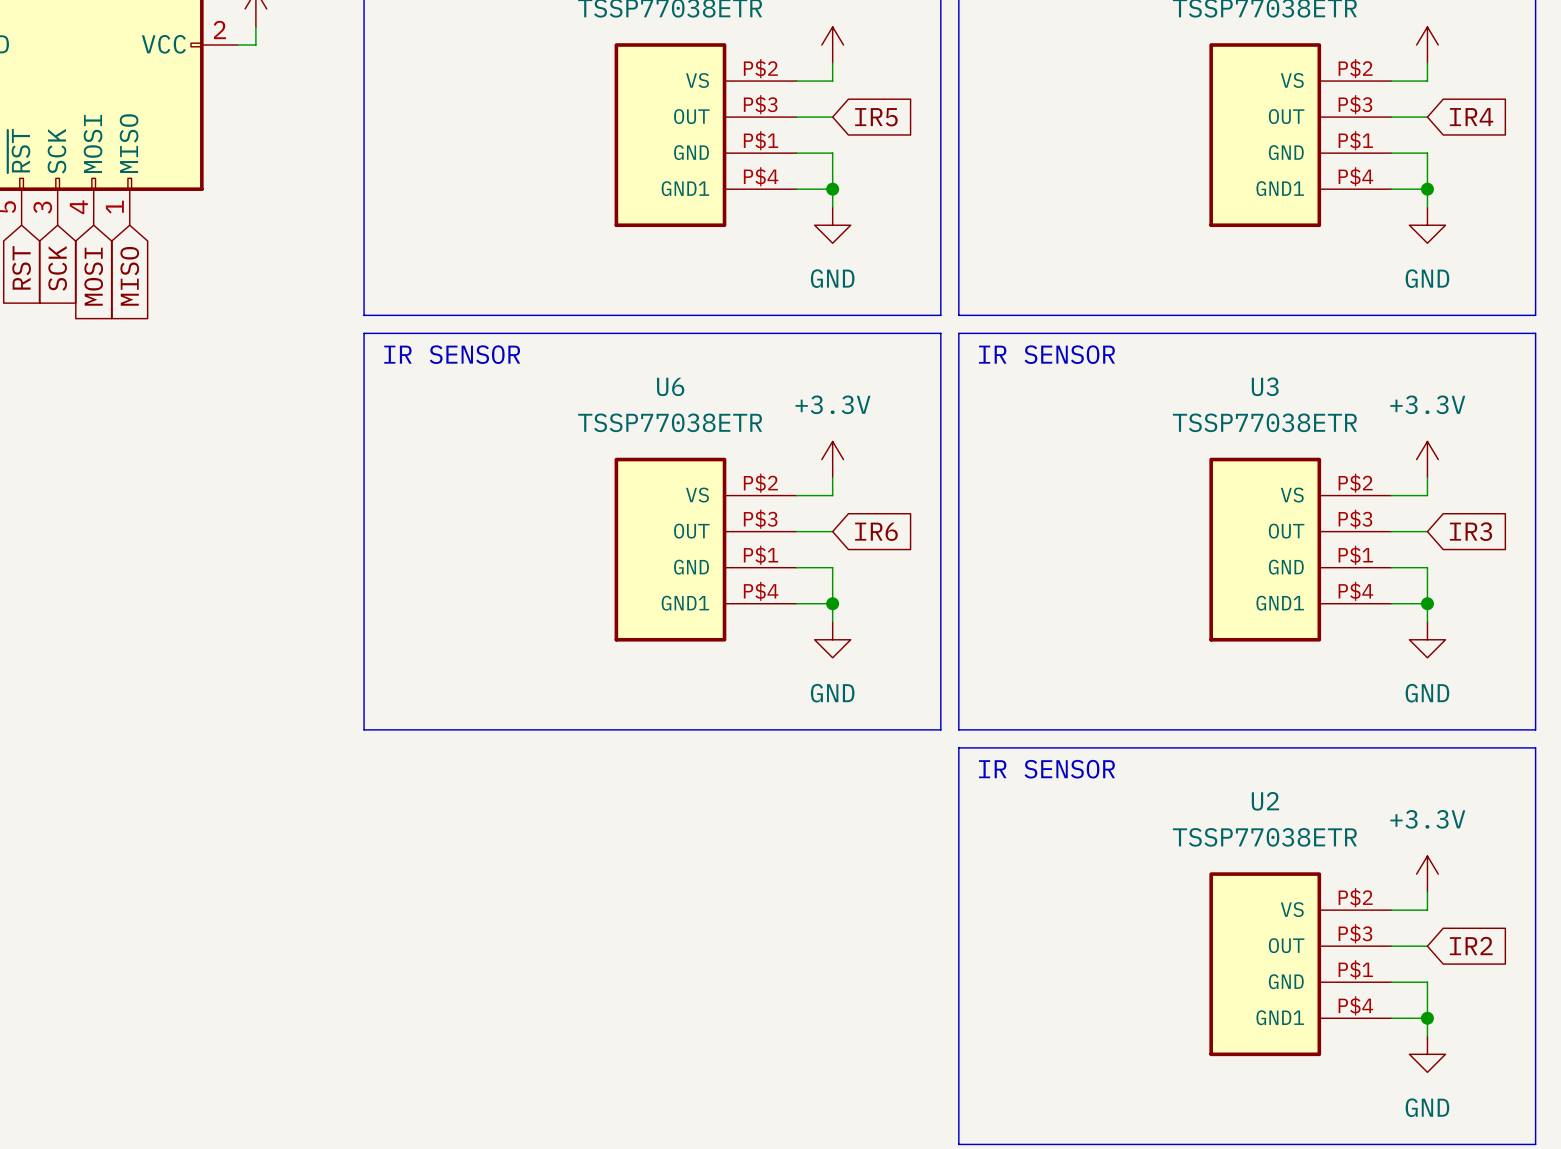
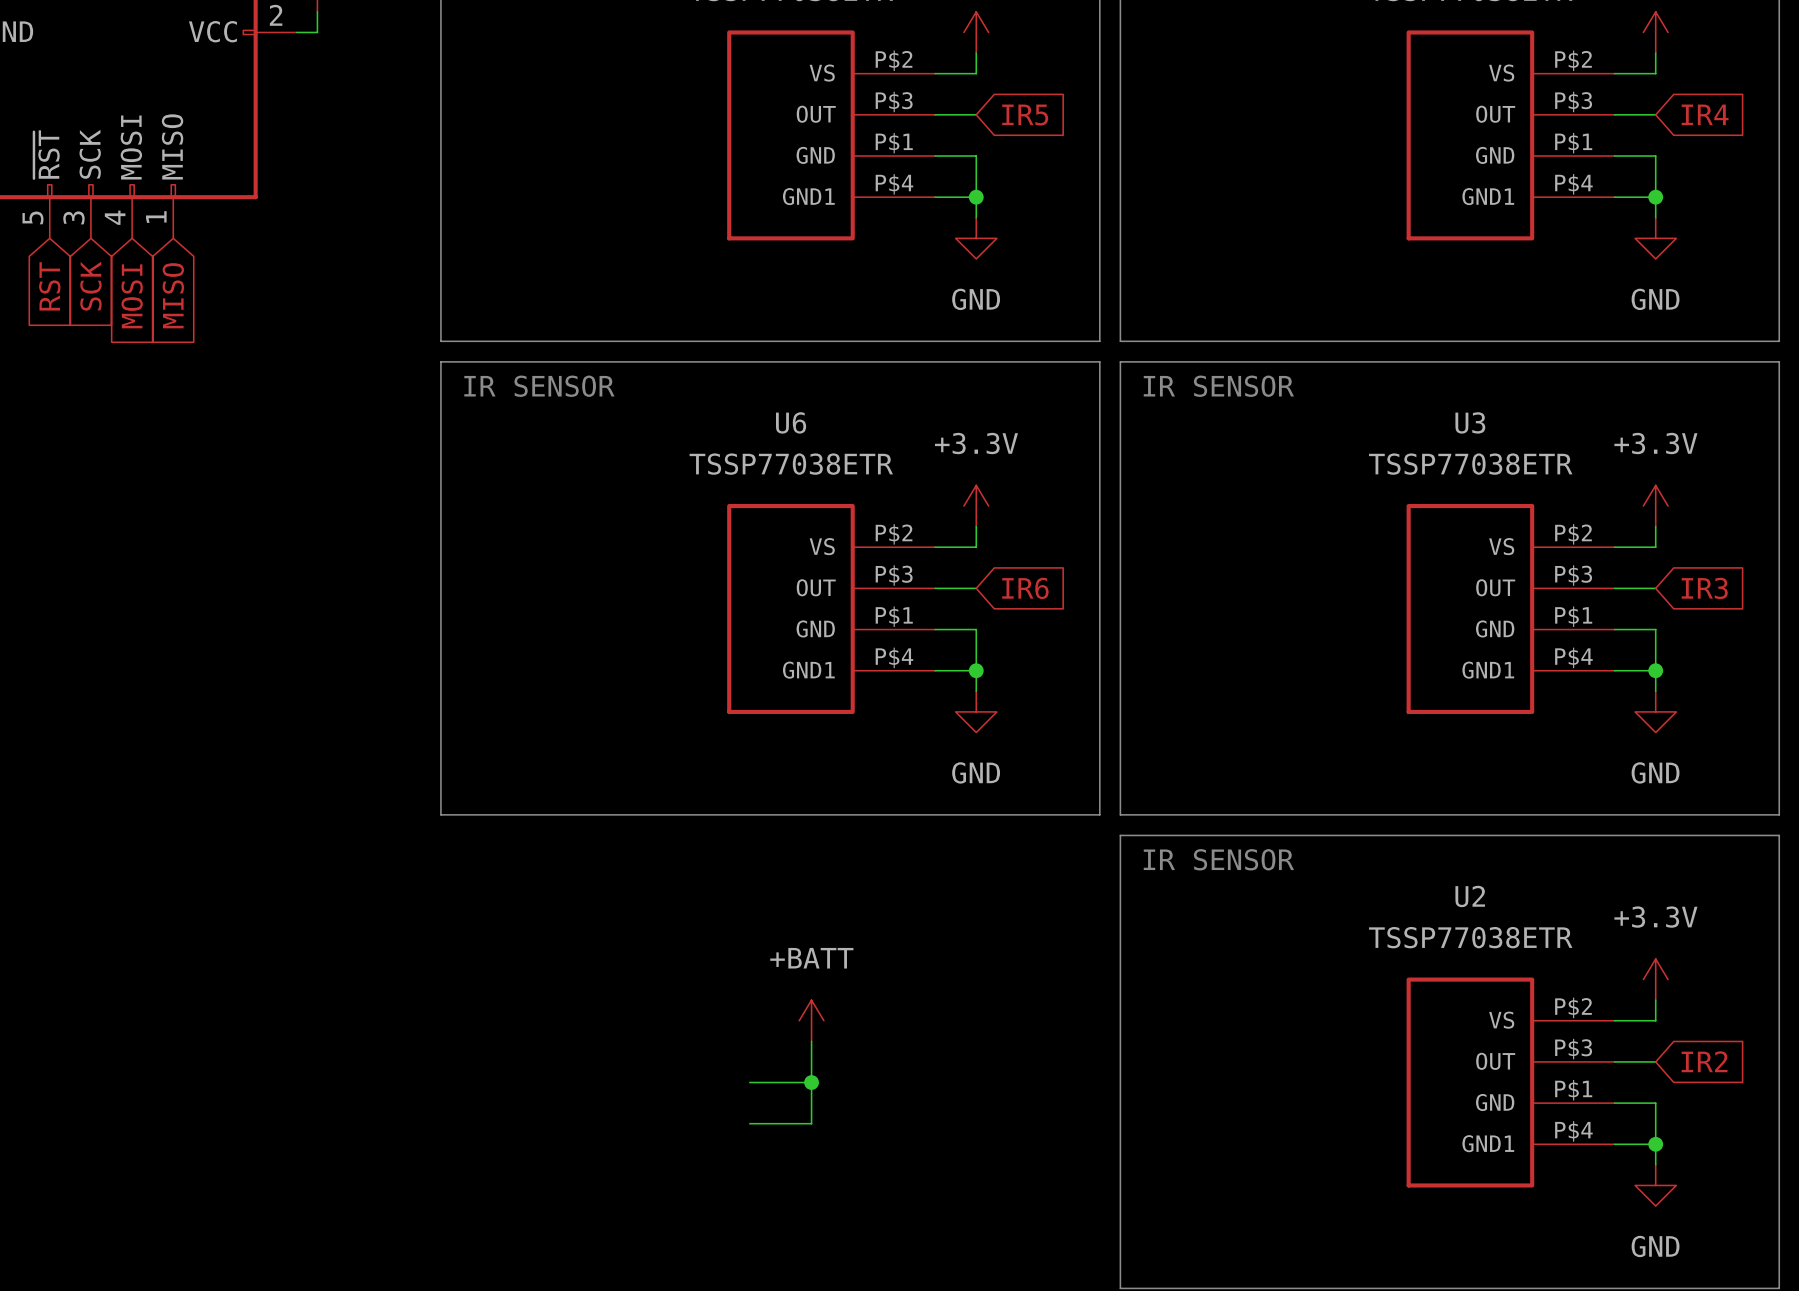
power symbol: none -> +BATT (811, 1020)
wire: none -> (811, 1041) (811, 1123) (749, 1123)
wire: none -> (749, 1082) (811, 1082)
junction: none -> (811, 1082)

